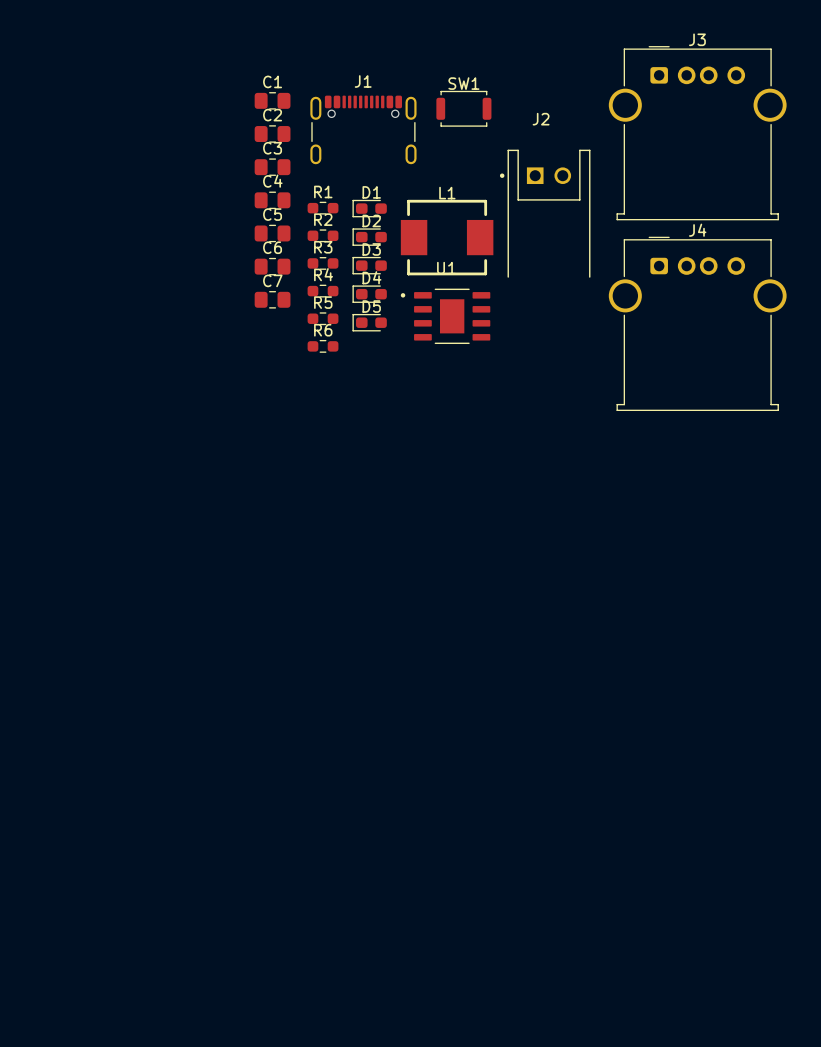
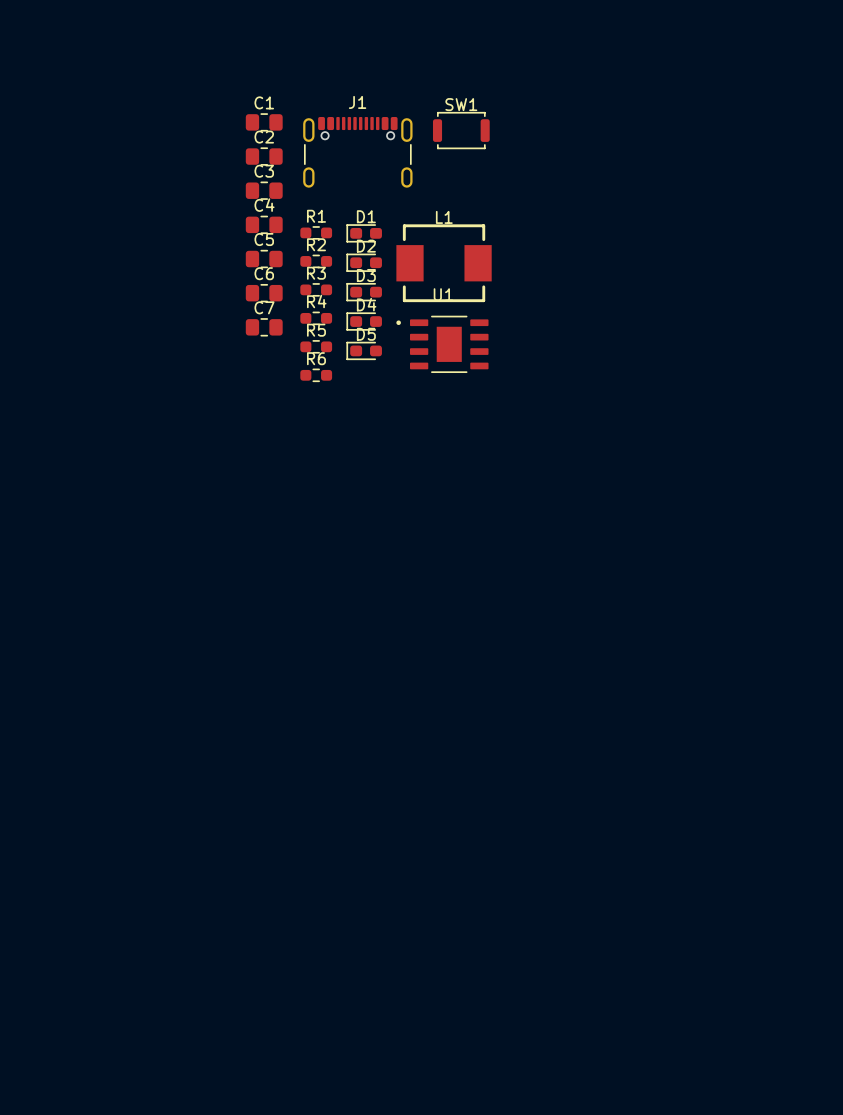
J3: (697, 133) -> none
J2: (545, 213) -> none
J4: (697, 323) -> none

